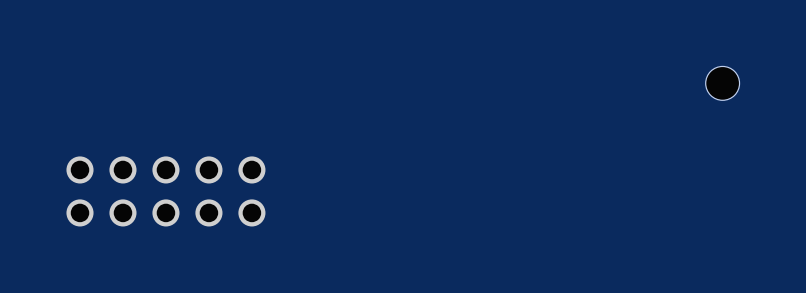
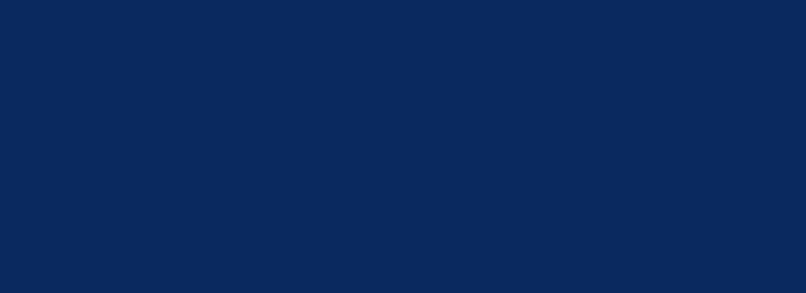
part: (722, 83) -> none
part: (165, 191) -> none

